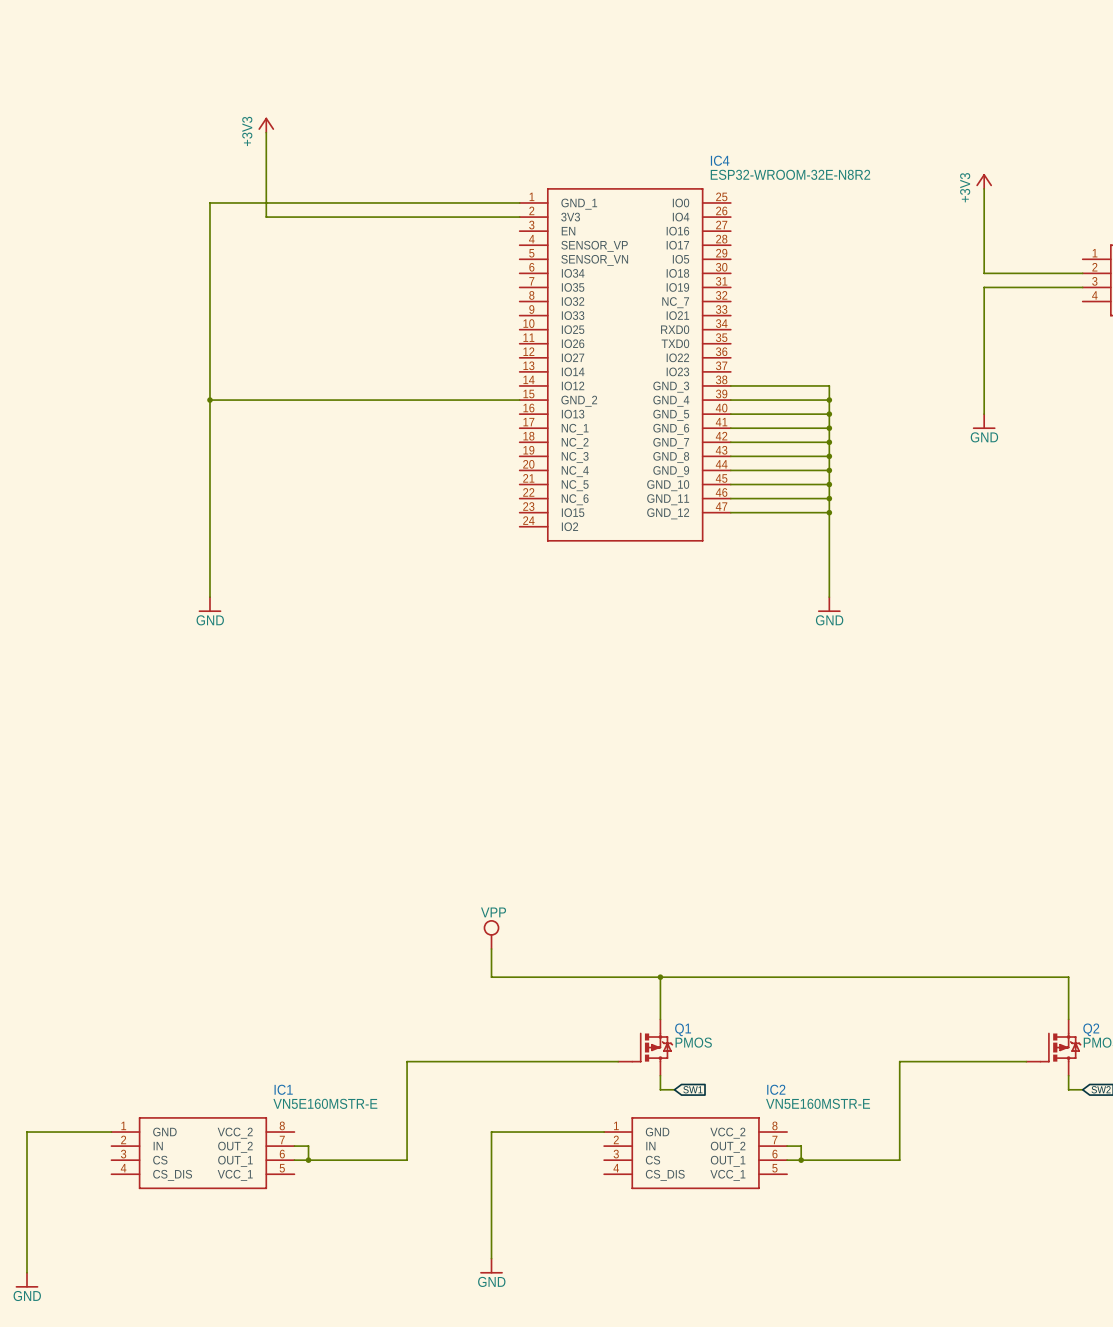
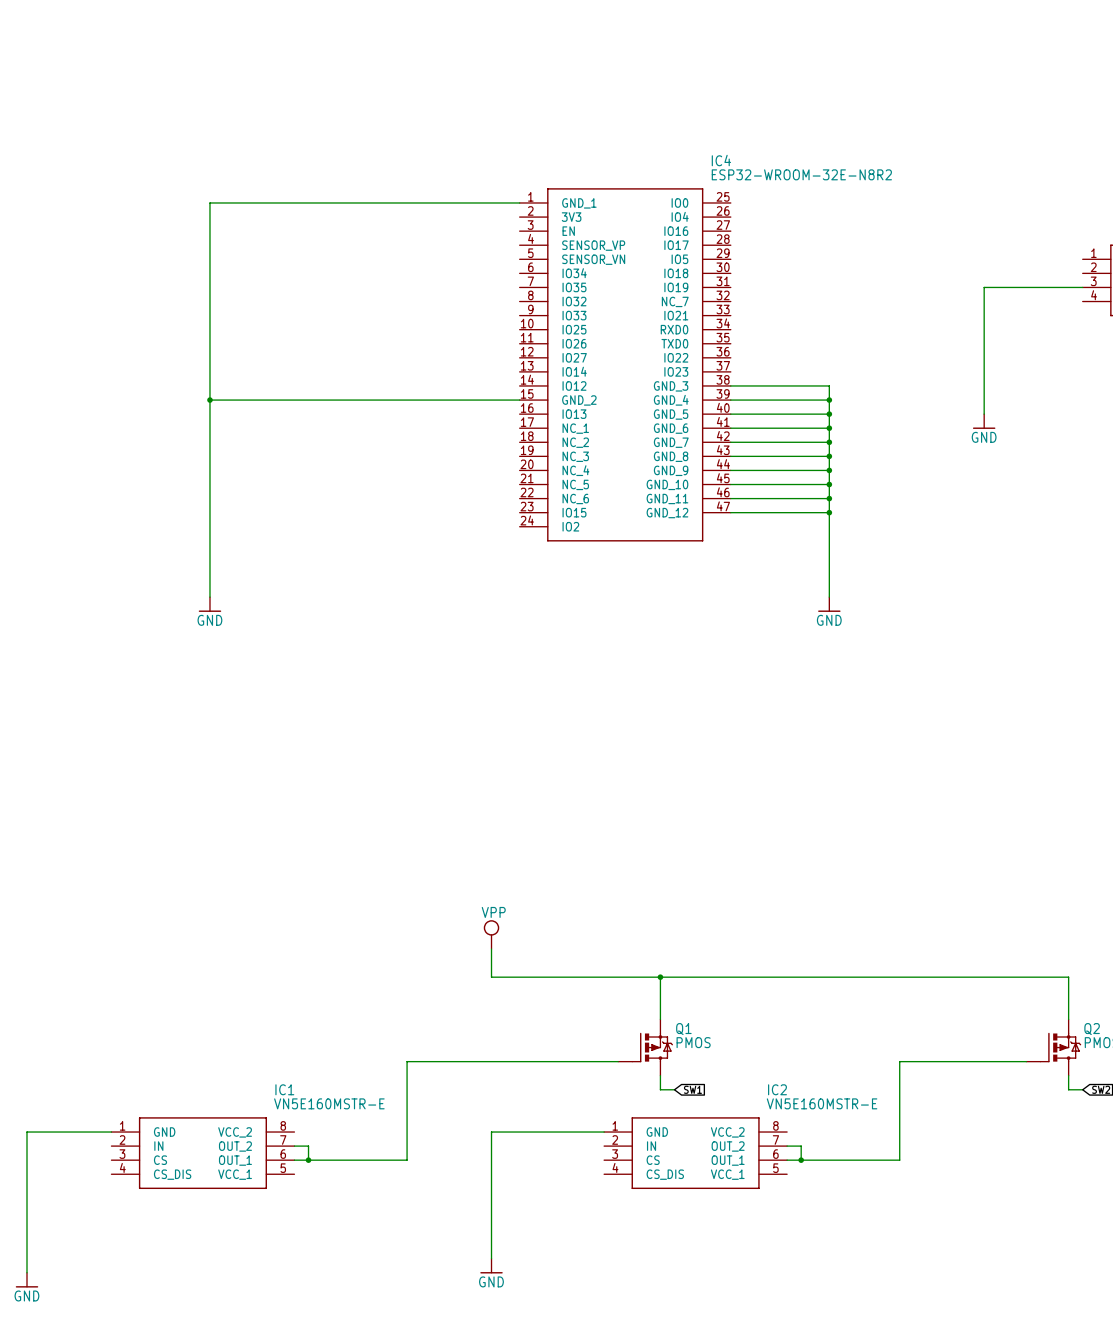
power symbol: +3V3 (266, 125) -> none
wire: (266, 132) (266, 217) (519, 217) -> none
power symbol: +3V3 (984, 181) -> none
wire: (984, 188) (984, 273) (1082, 273) -> none

